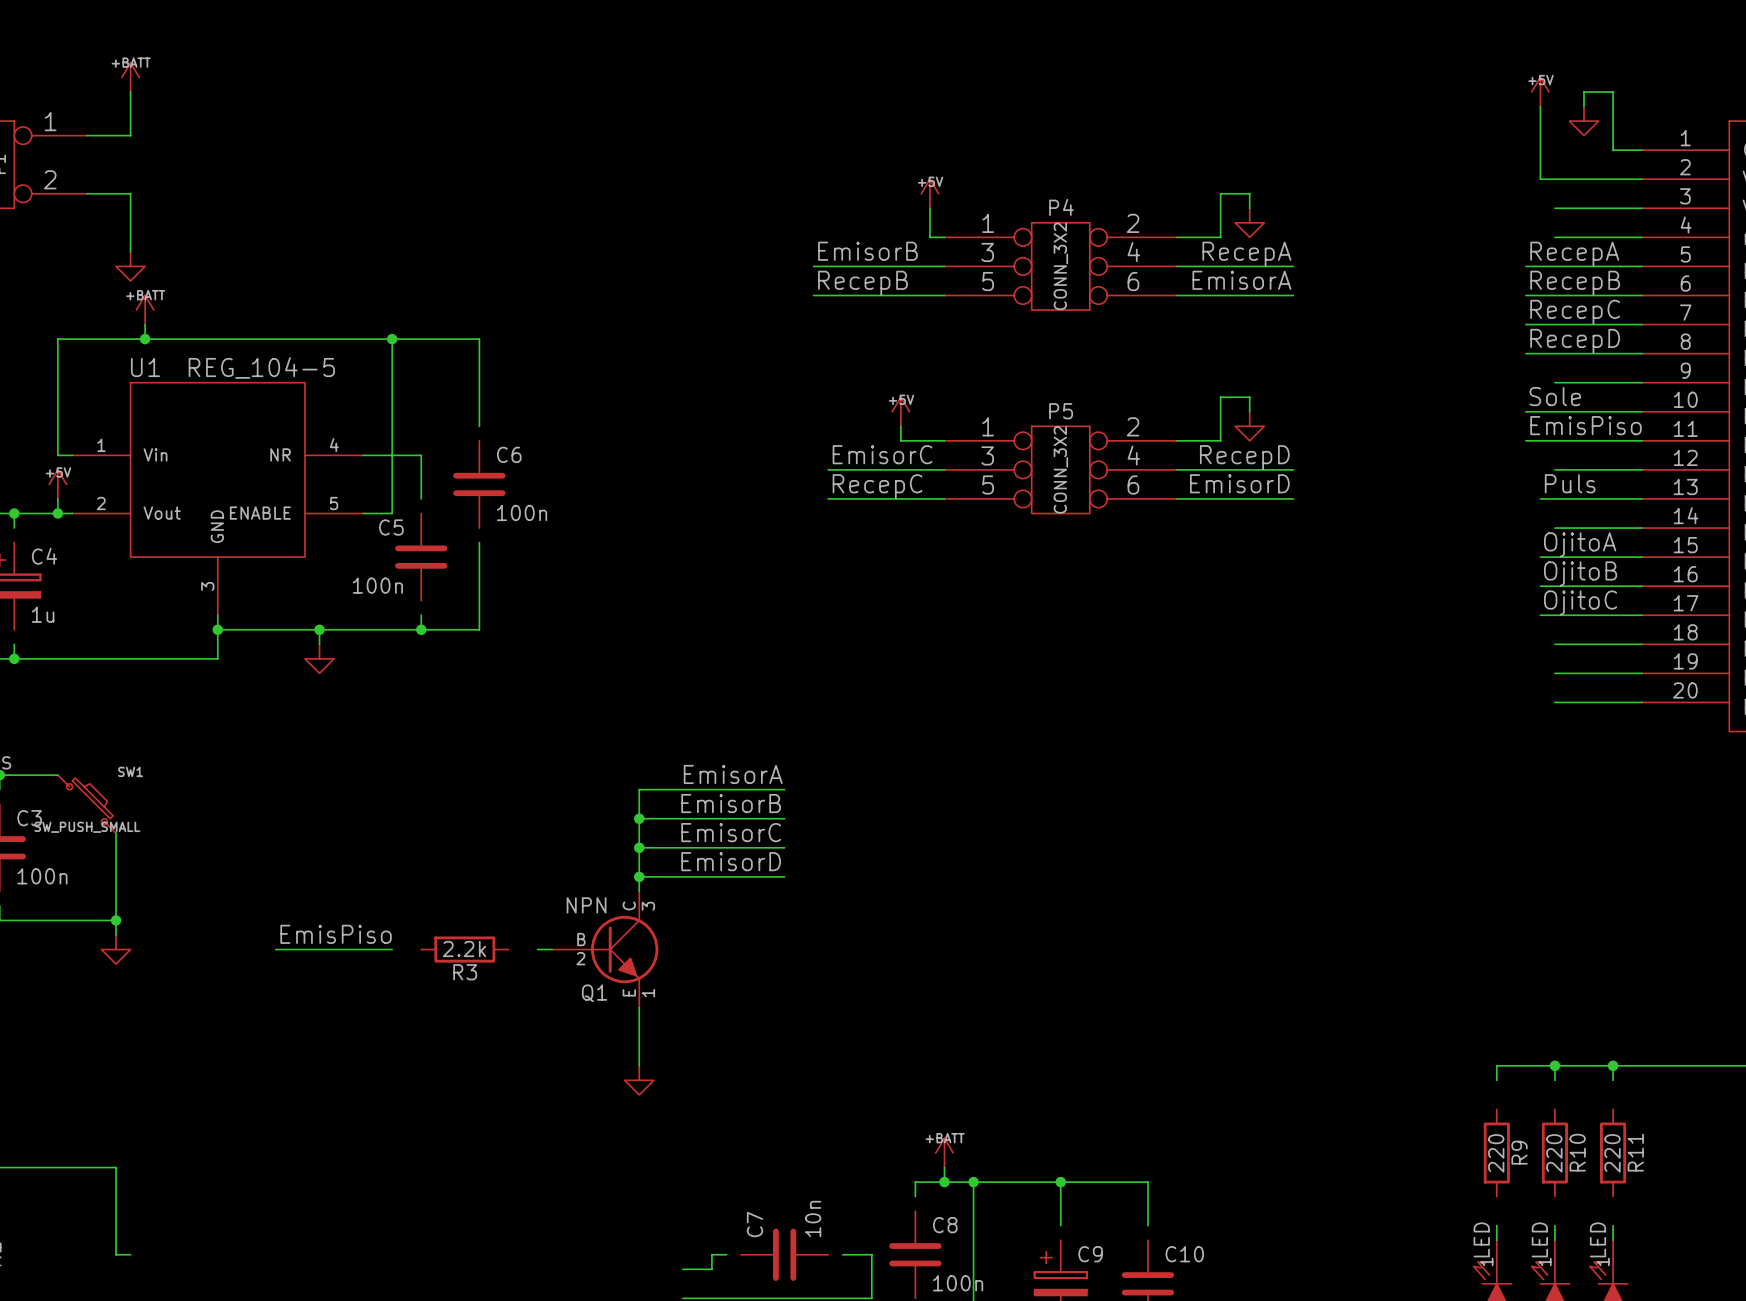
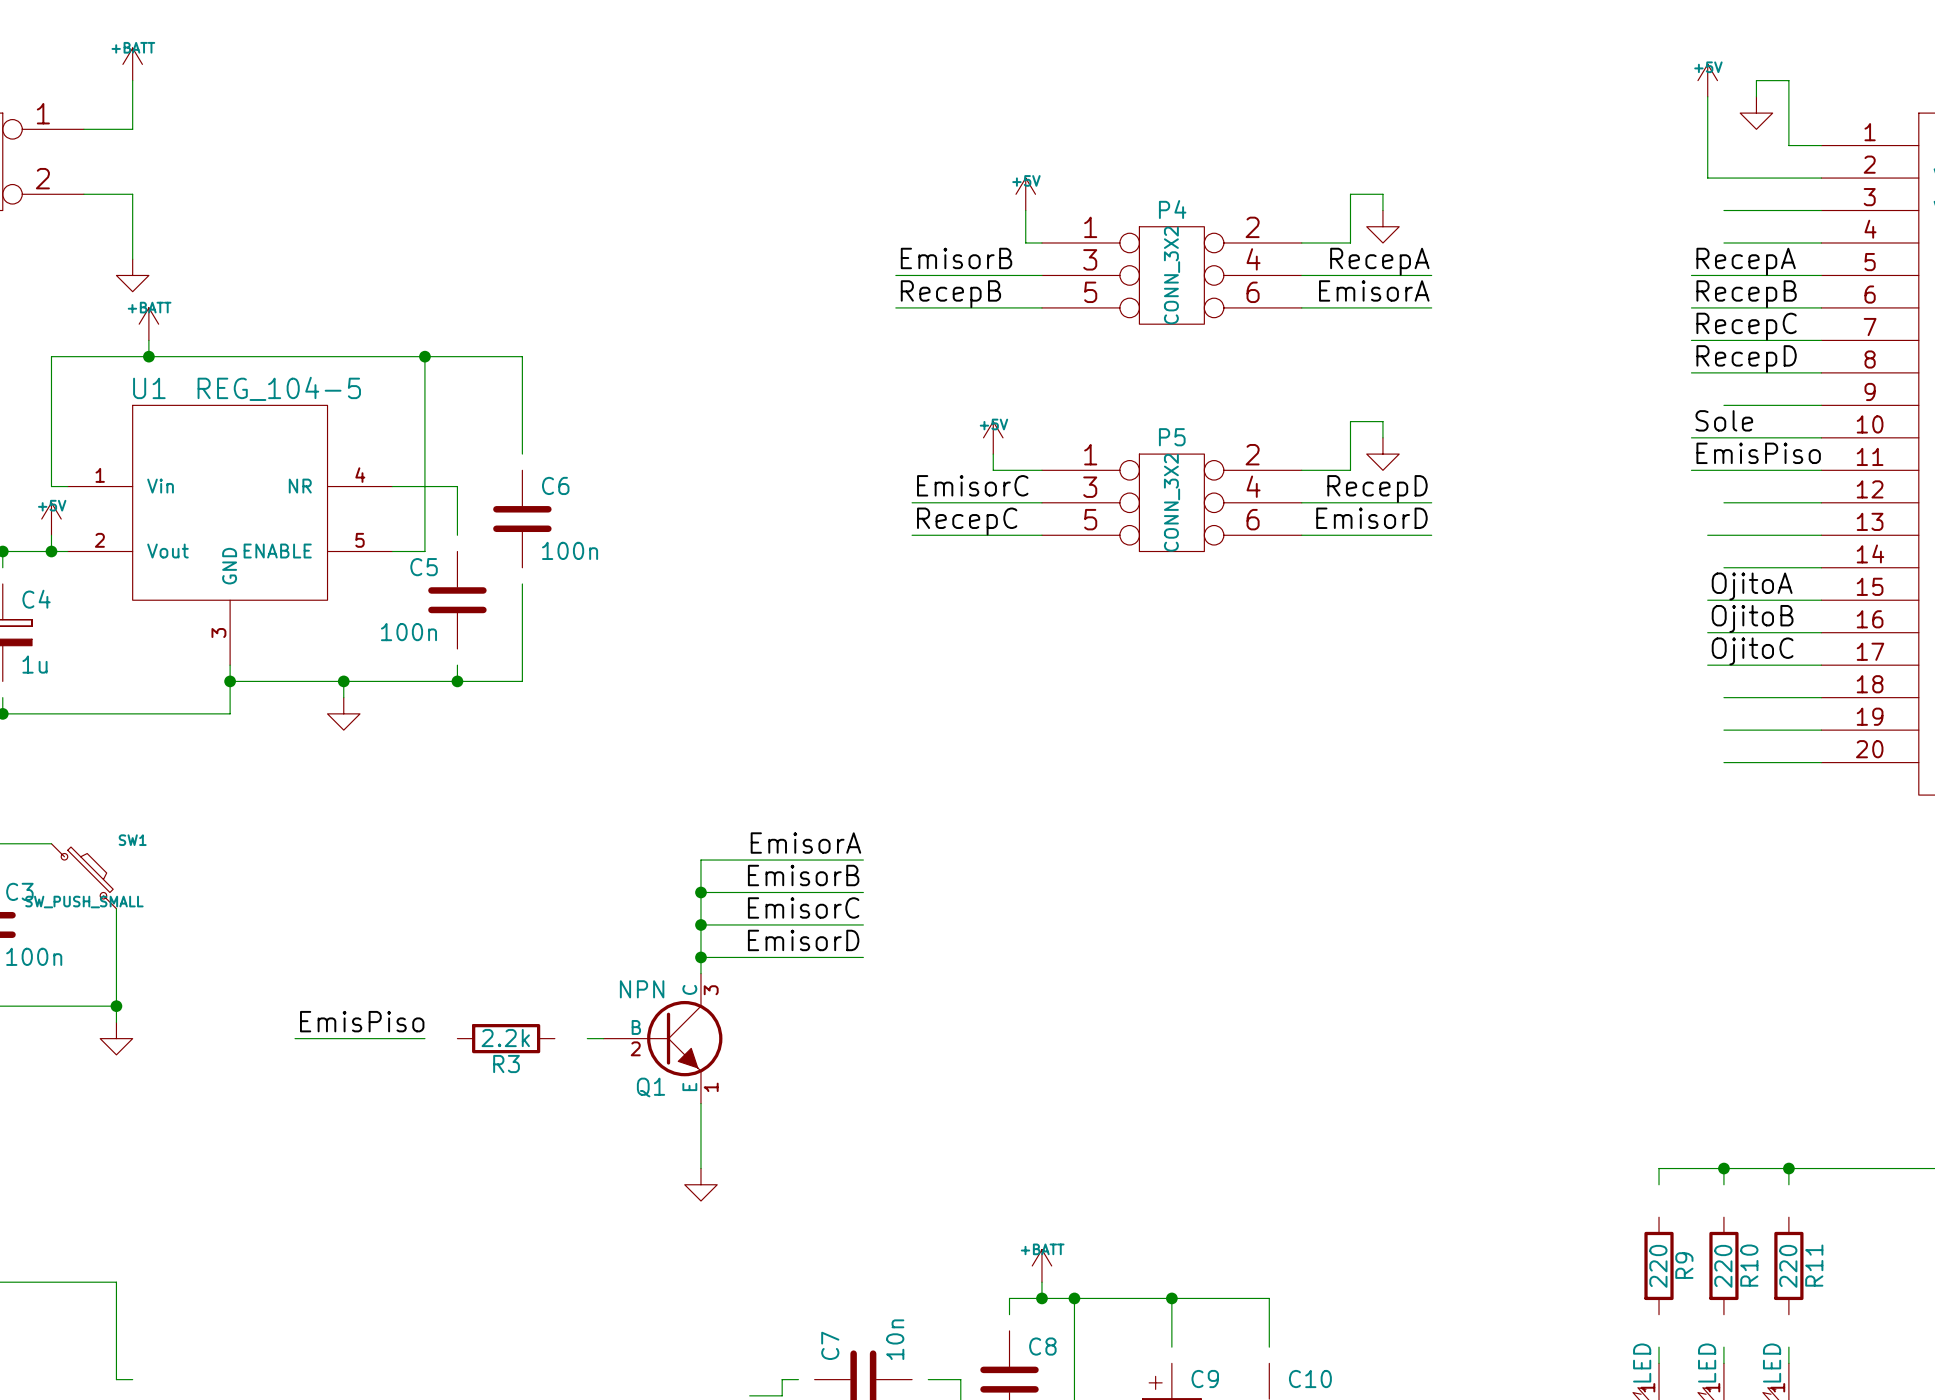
label: Puls (1570, 483) -> none

